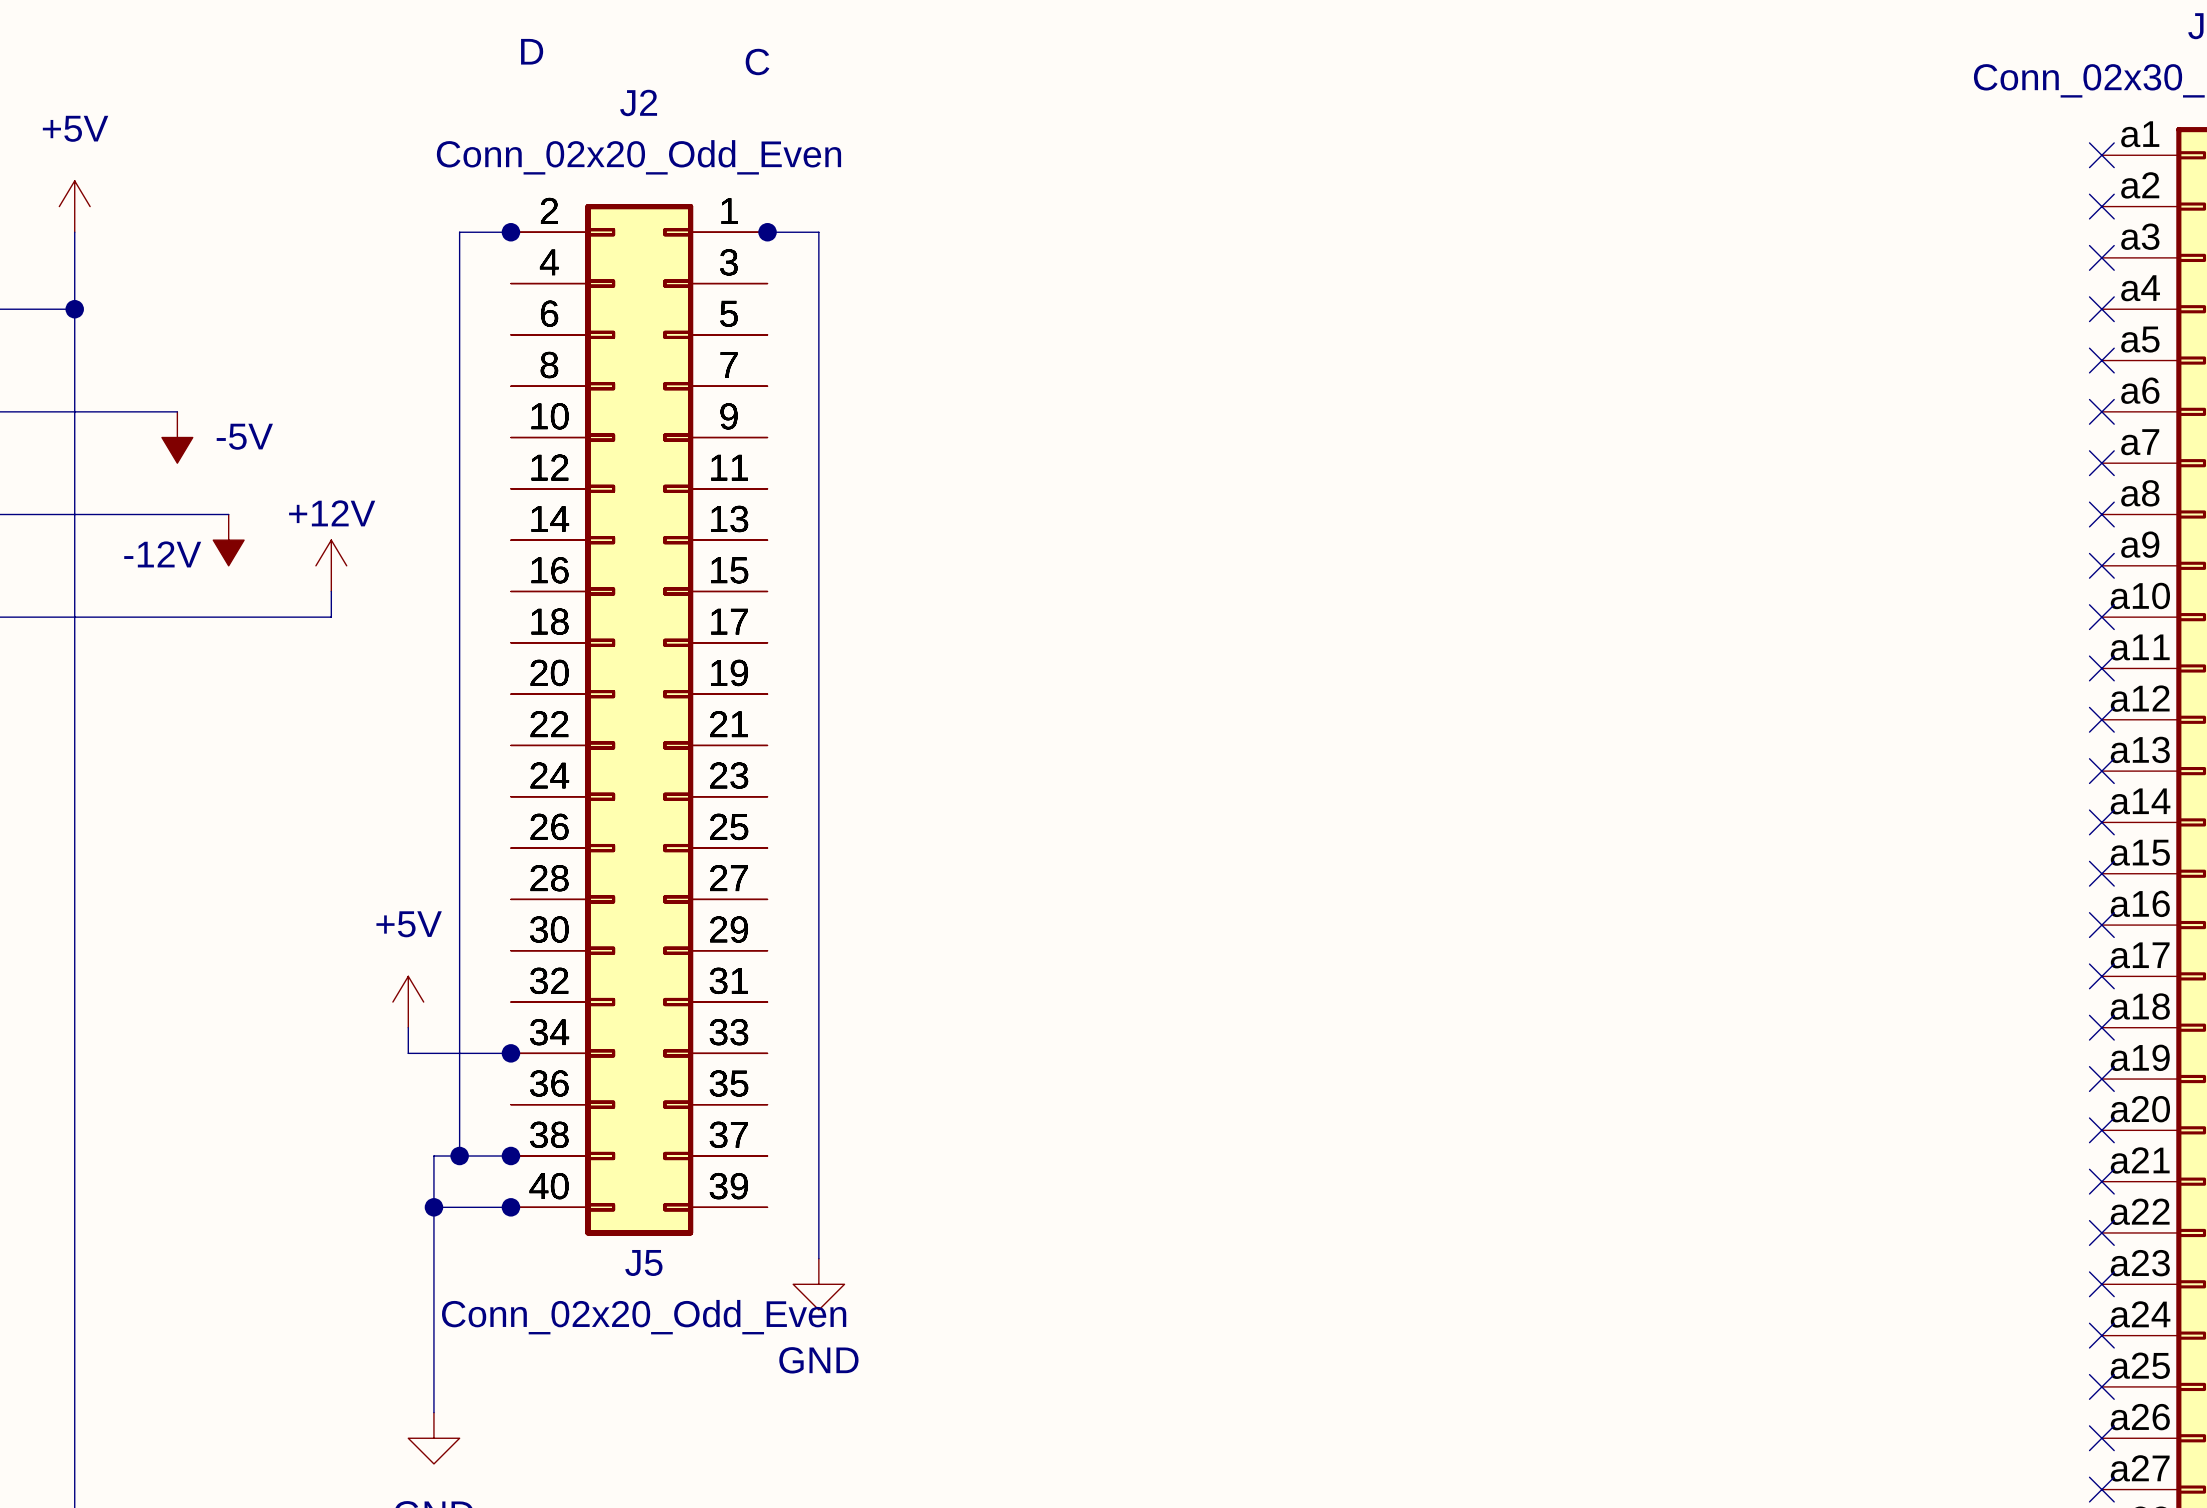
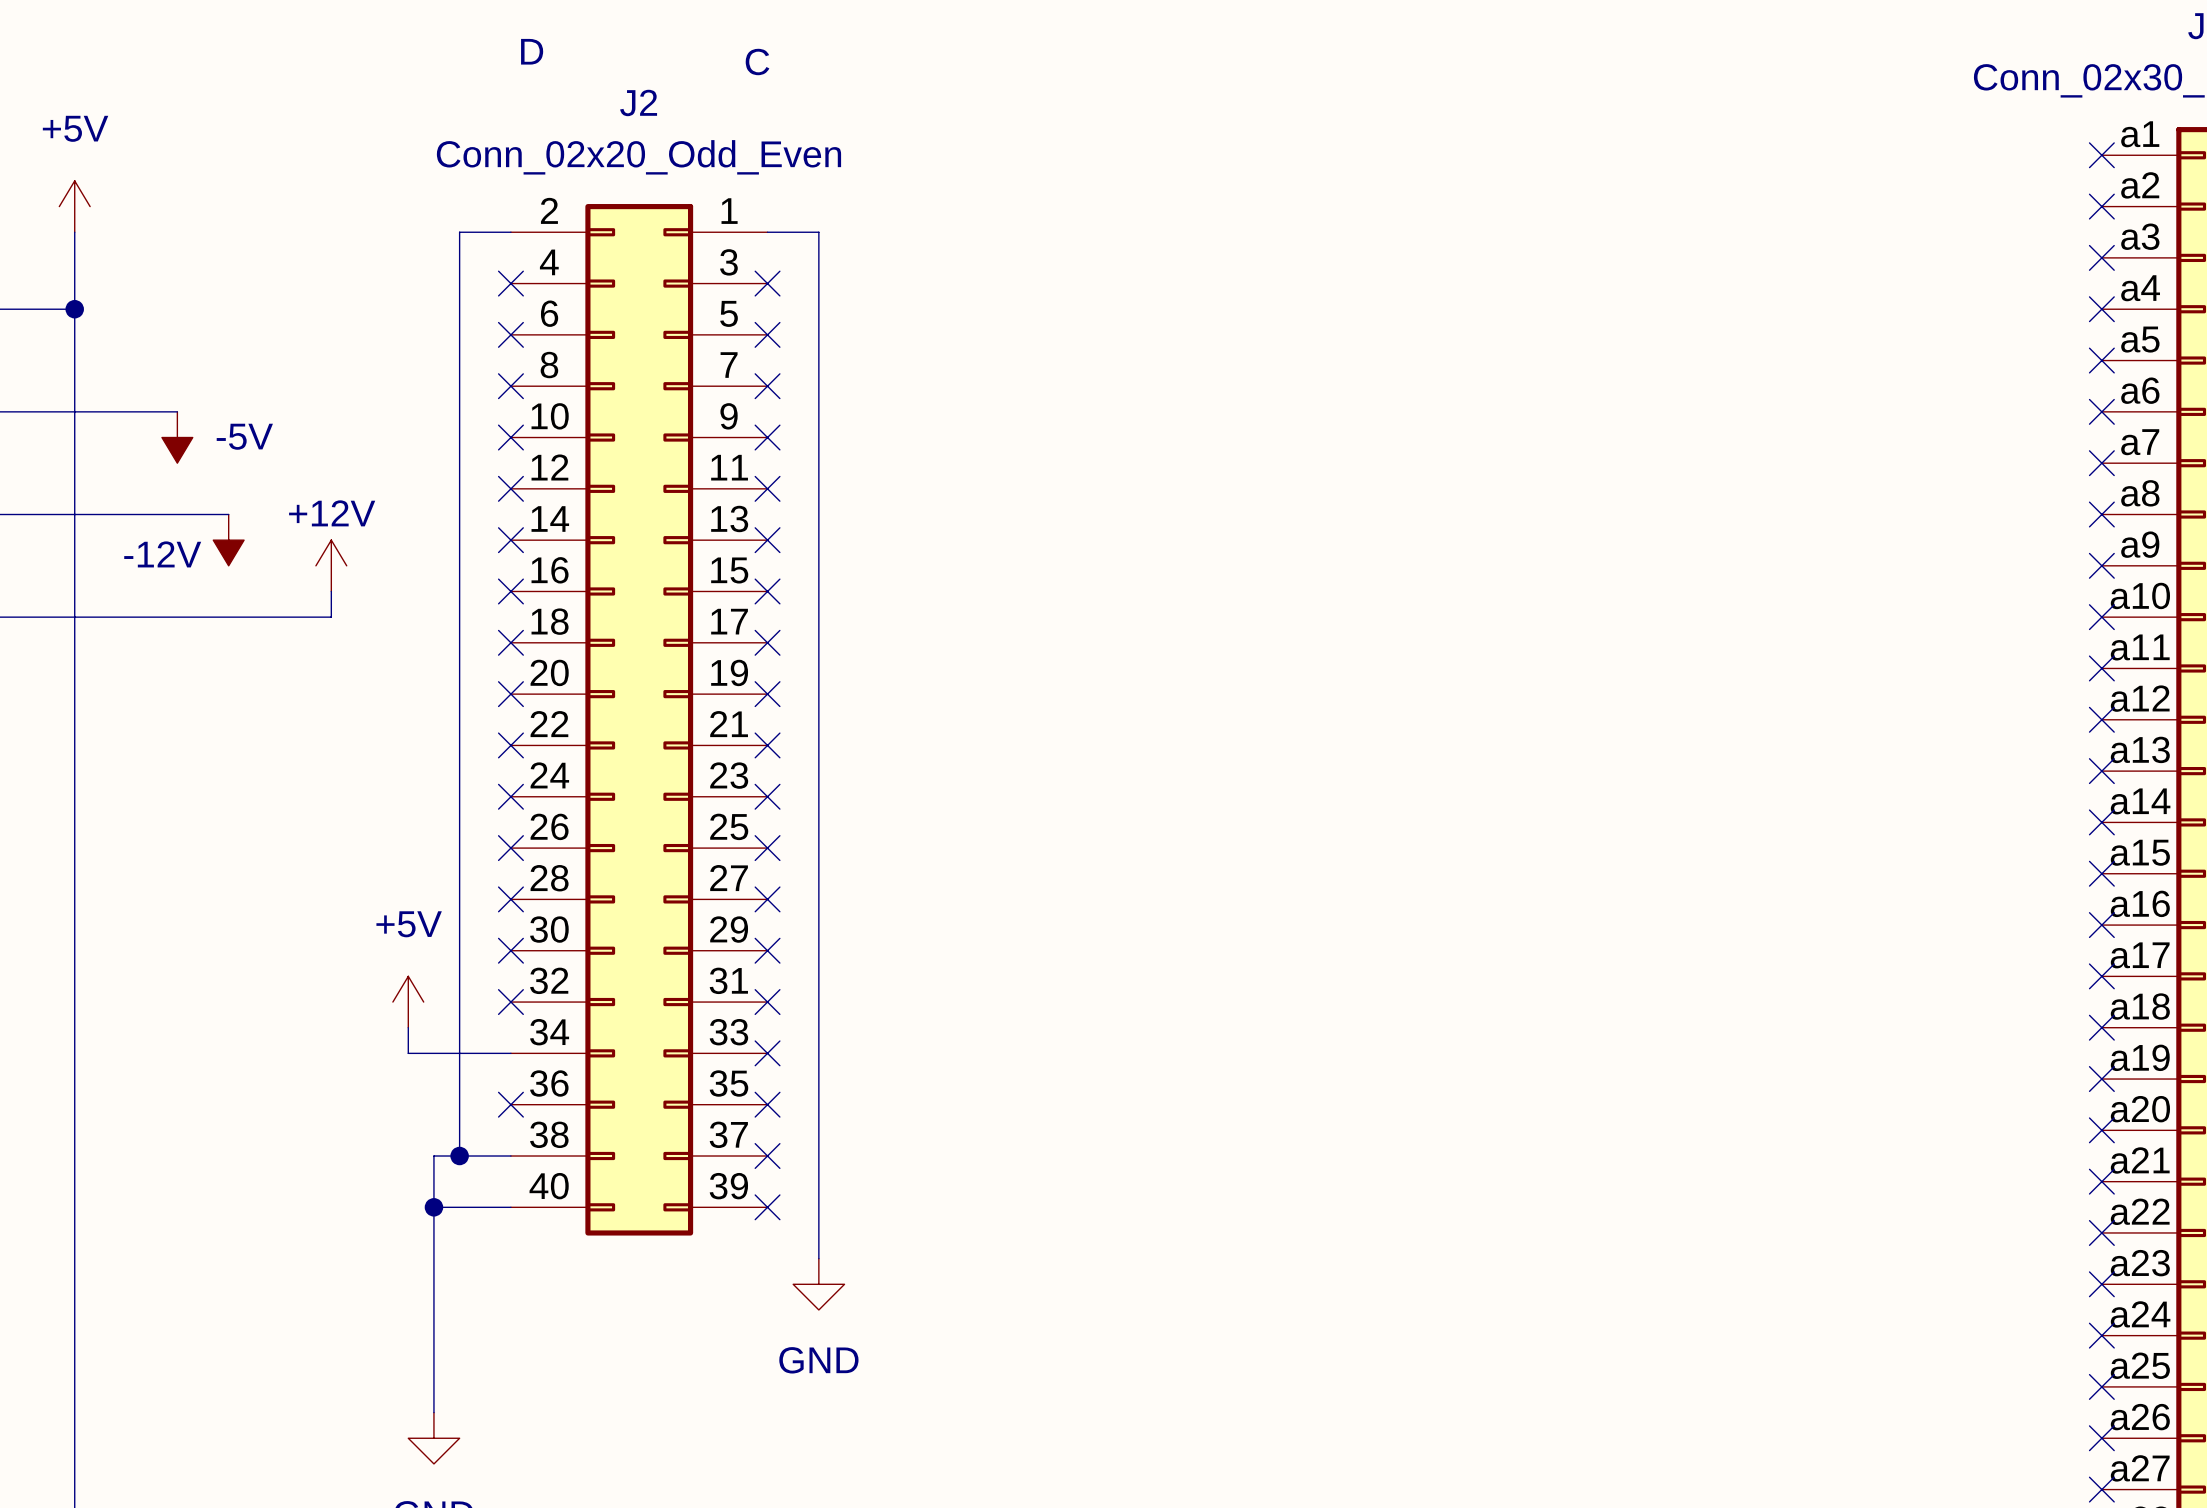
junction: (510, 232) -> none
junction: (767, 232) -> none
no-connect mark: none -> (510, 283)
no-connect mark: none -> (767, 283)
no-connect mark: none -> (510, 334)
no-connect mark: none -> (767, 334)
no-connect mark: none -> (510, 386)
no-connect mark: none -> (767, 386)
no-connect mark: none -> (510, 437)
no-connect mark: none -> (767, 437)
no-connect mark: none -> (510, 488)
no-connect mark: none -> (767, 488)
no-connect mark: none -> (510, 540)
no-connect mark: none -> (767, 540)
no-connect mark: none -> (510, 591)
no-connect mark: none -> (767, 591)
no-connect mark: none -> (510, 642)
no-connect mark: none -> (767, 642)
no-connect mark: none -> (510, 694)
no-connect mark: none -> (767, 694)
J5: Conn_02x20_Odd_Even (639, 719) -> none
no-connect mark: none -> (510, 745)
no-connect mark: none -> (767, 745)
no-connect mark: none -> (510, 796)
no-connect mark: none -> (767, 796)
no-connect mark: none -> (510, 848)
no-connect mark: none -> (767, 848)
no-connect mark: none -> (510, 899)
no-connect mark: none -> (767, 899)
no-connect mark: none -> (510, 950)
no-connect mark: none -> (767, 950)
no-connect mark: none -> (510, 1002)
no-connect mark: none -> (767, 1002)
junction: (510, 1053) -> none
no-connect mark: none -> (767, 1053)
no-connect mark: none -> (510, 1104)
no-connect mark: none -> (767, 1104)
junction: (510, 1156) -> none
no-connect mark: none -> (767, 1156)
junction: (510, 1207) -> none
no-connect mark: none -> (767, 1207)

